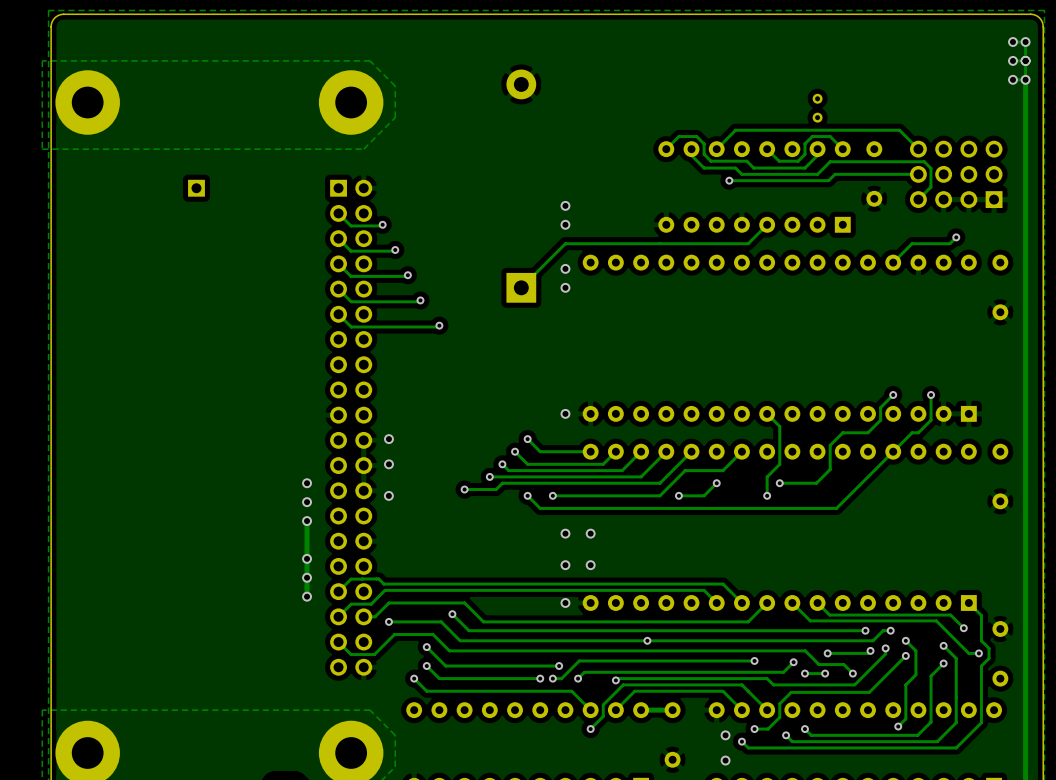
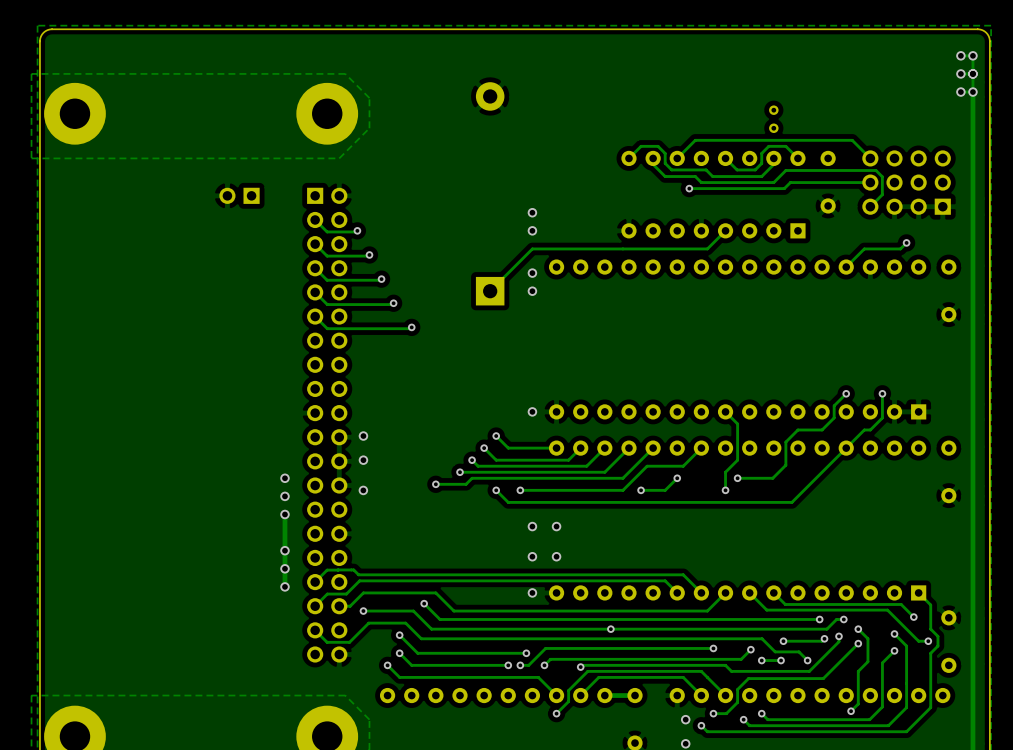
part: (196, 188) -> none
part: none -> (239, 195)

